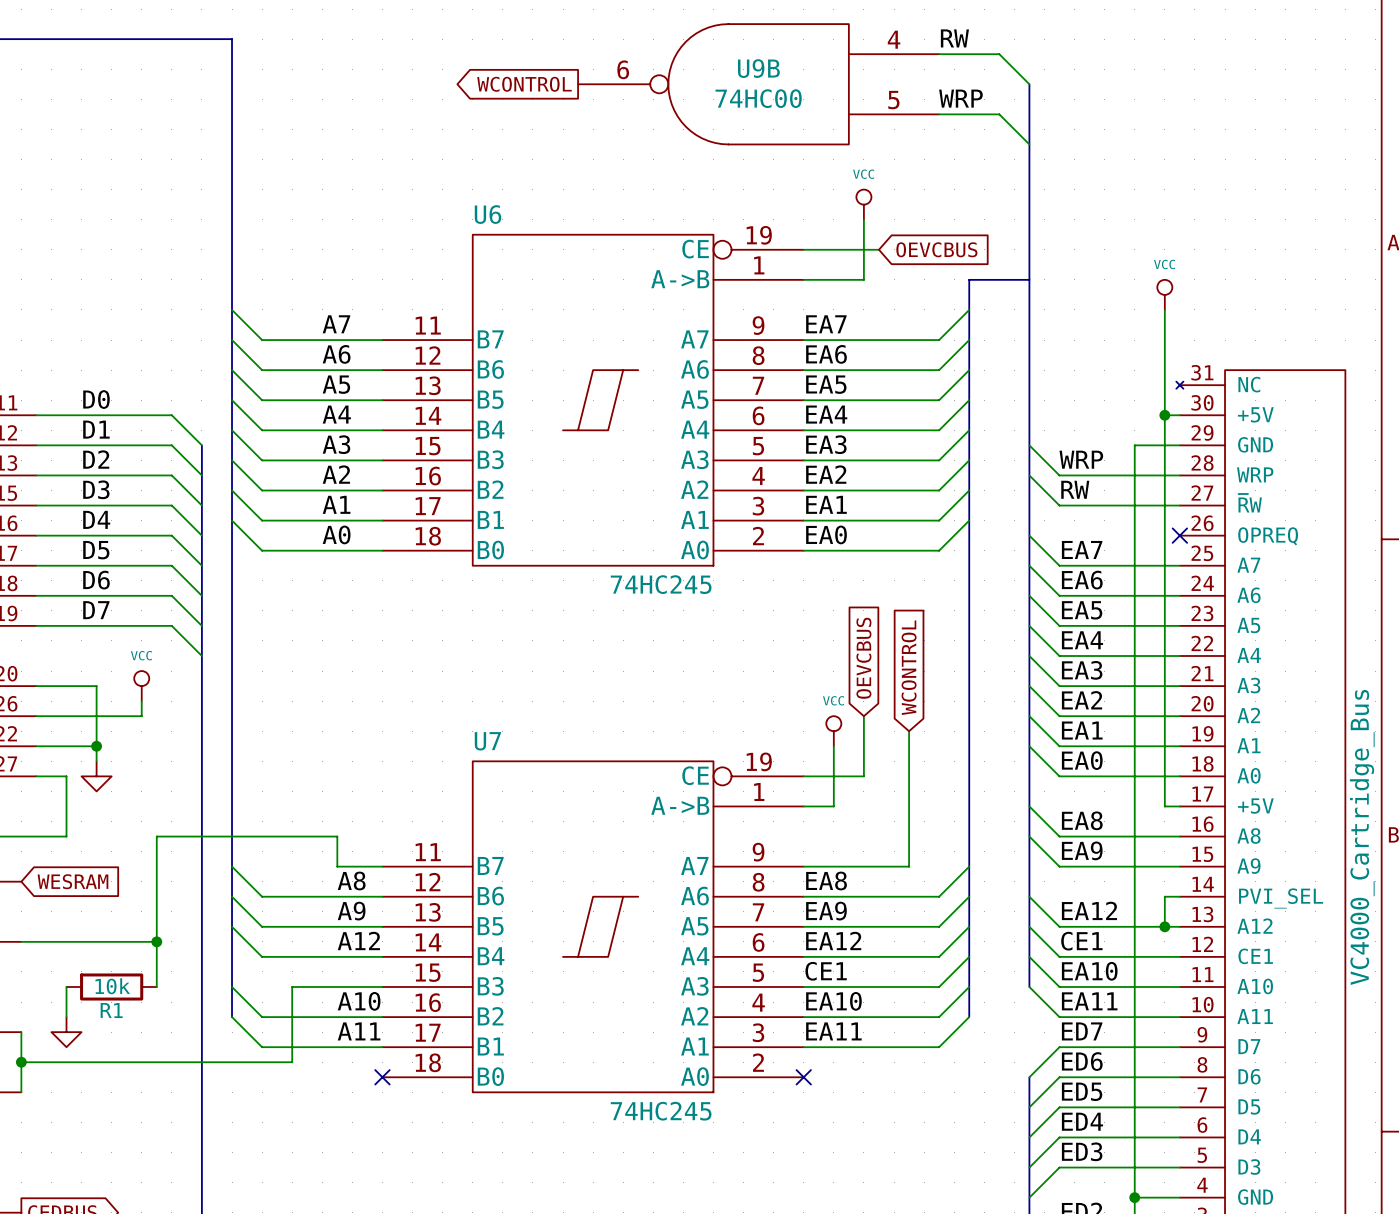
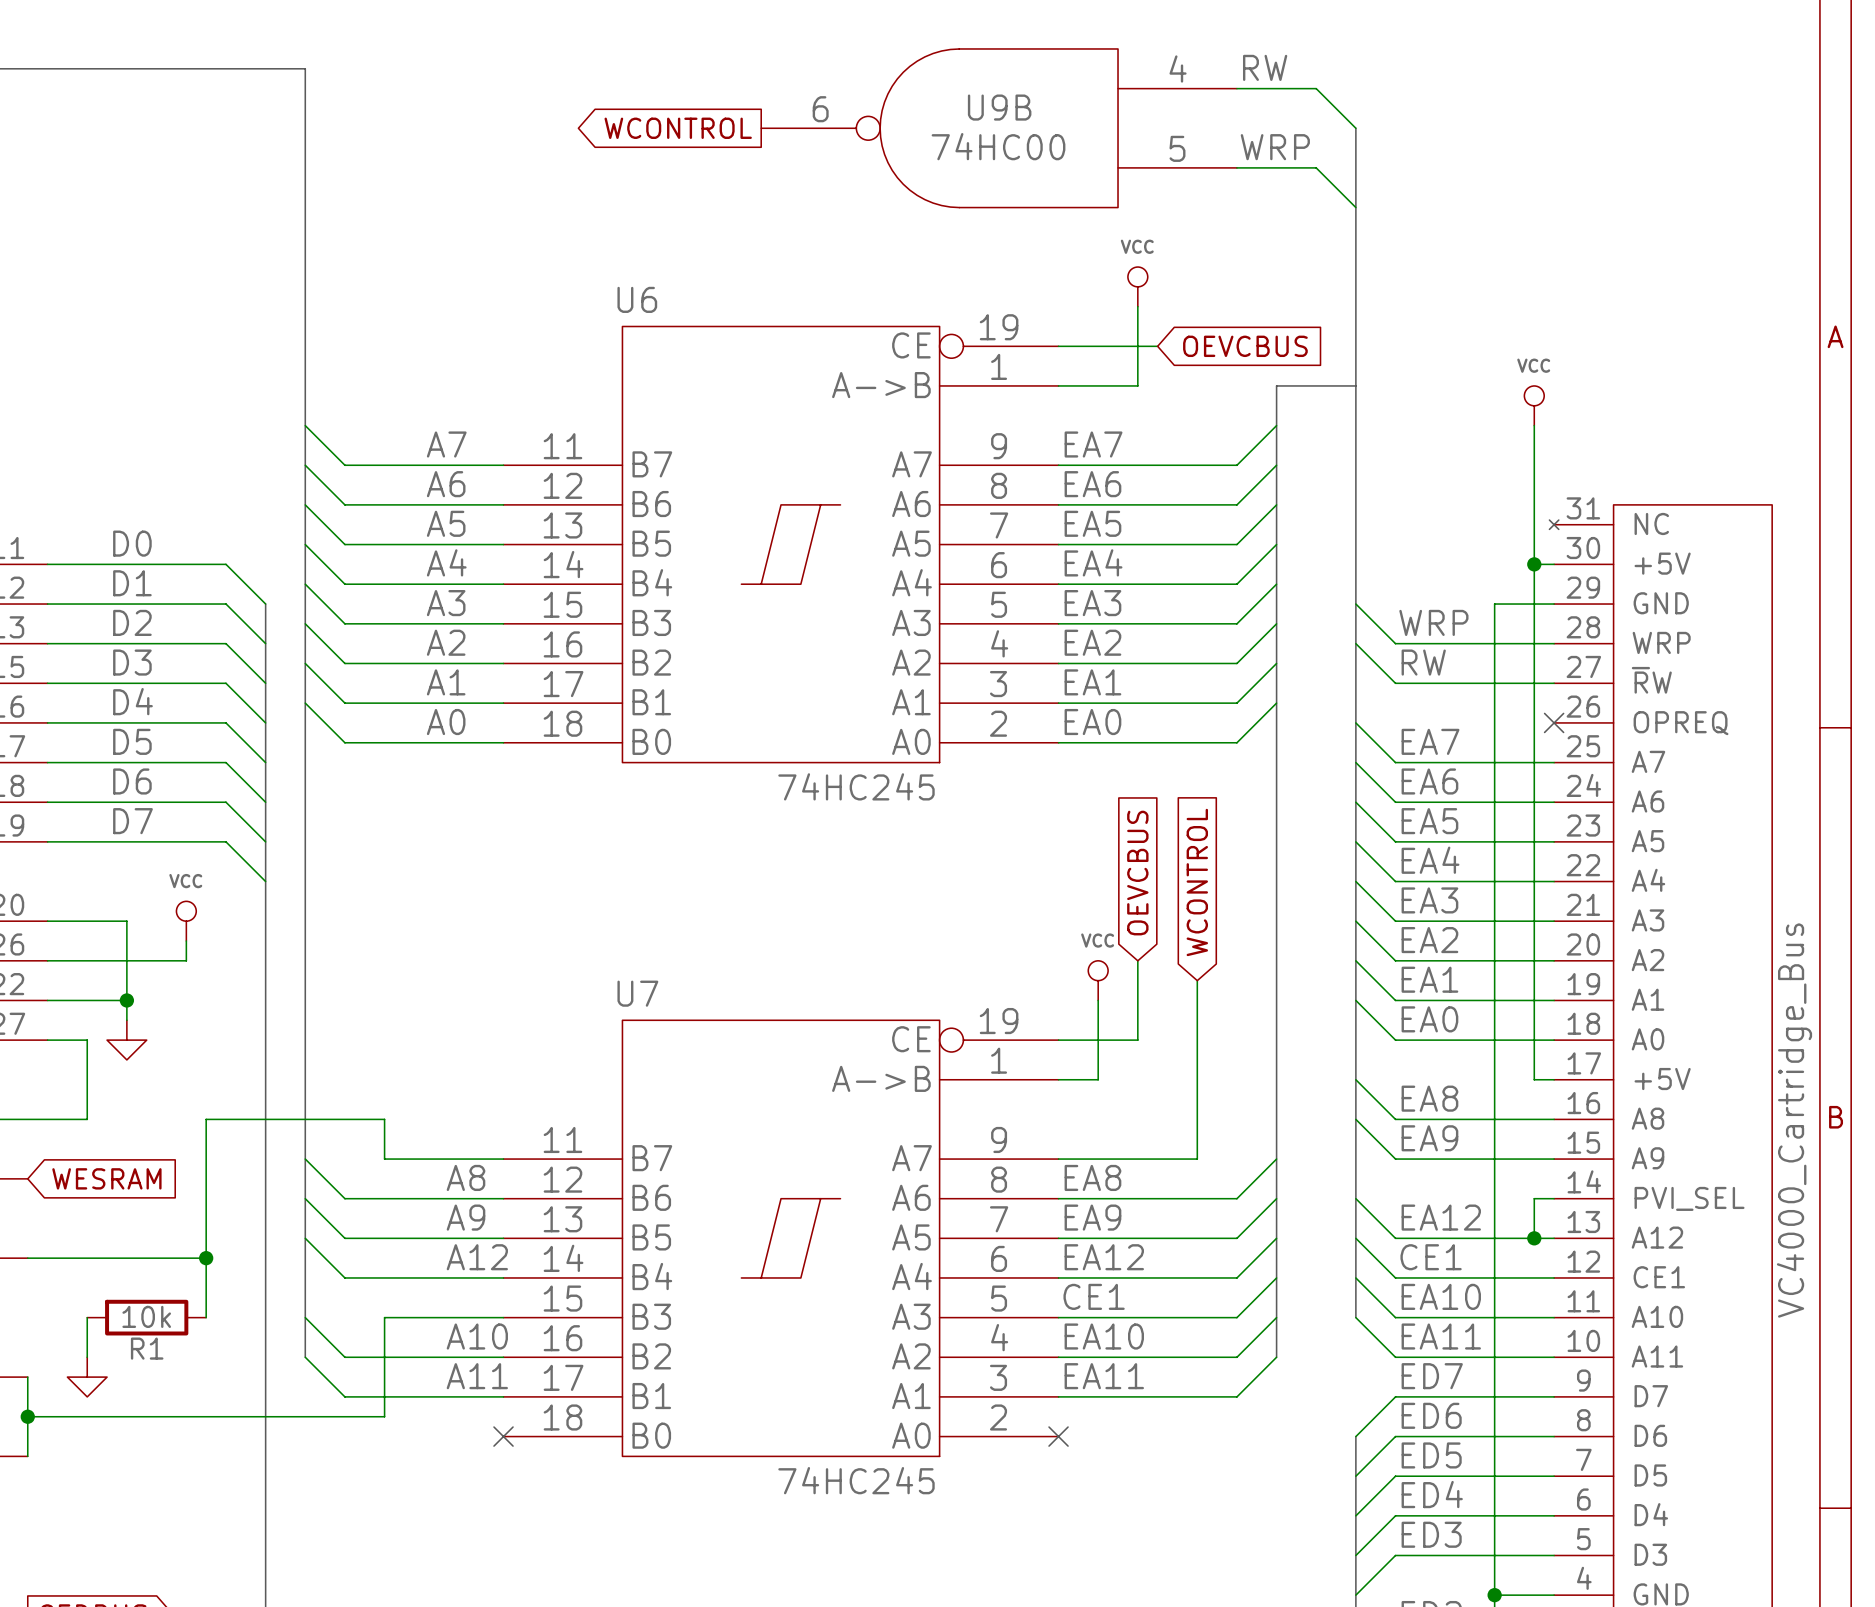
wire: (292, 836) (337, 836) (337, 866) -> (384, 1119) (384, 1159) (444, 1159)

